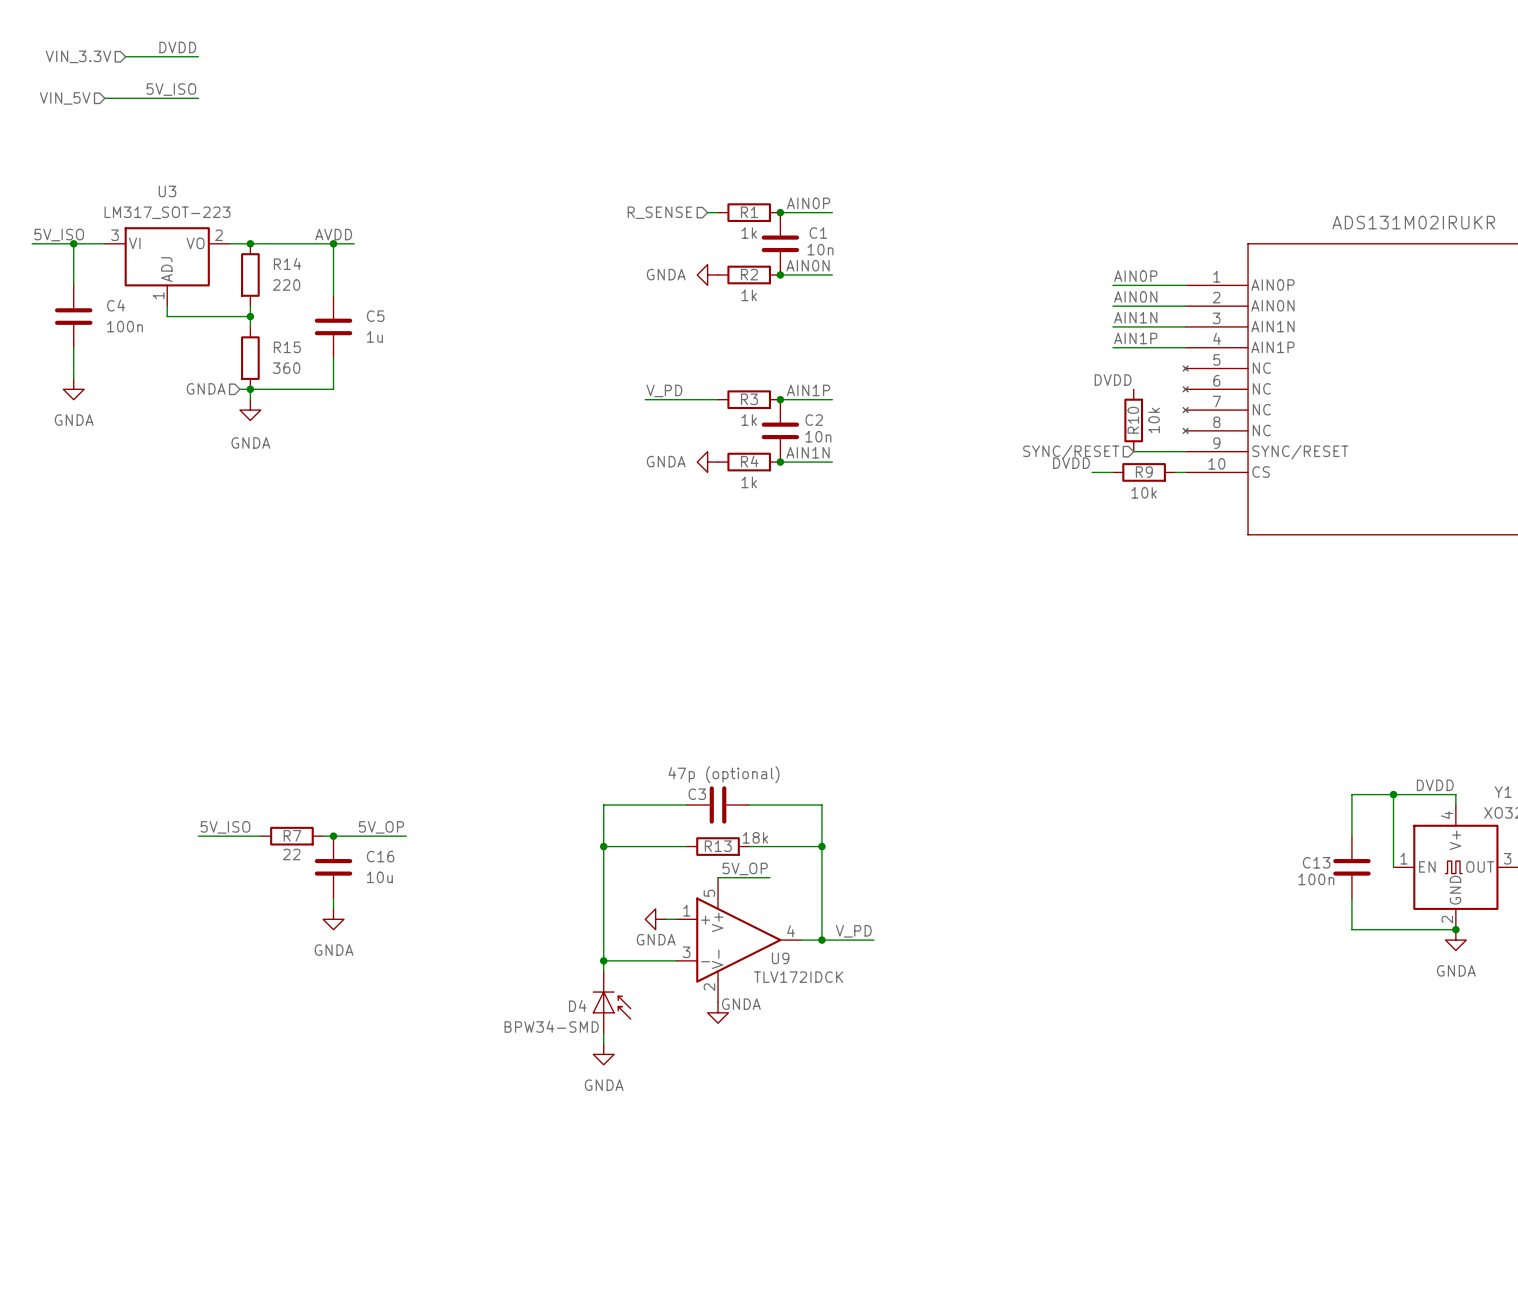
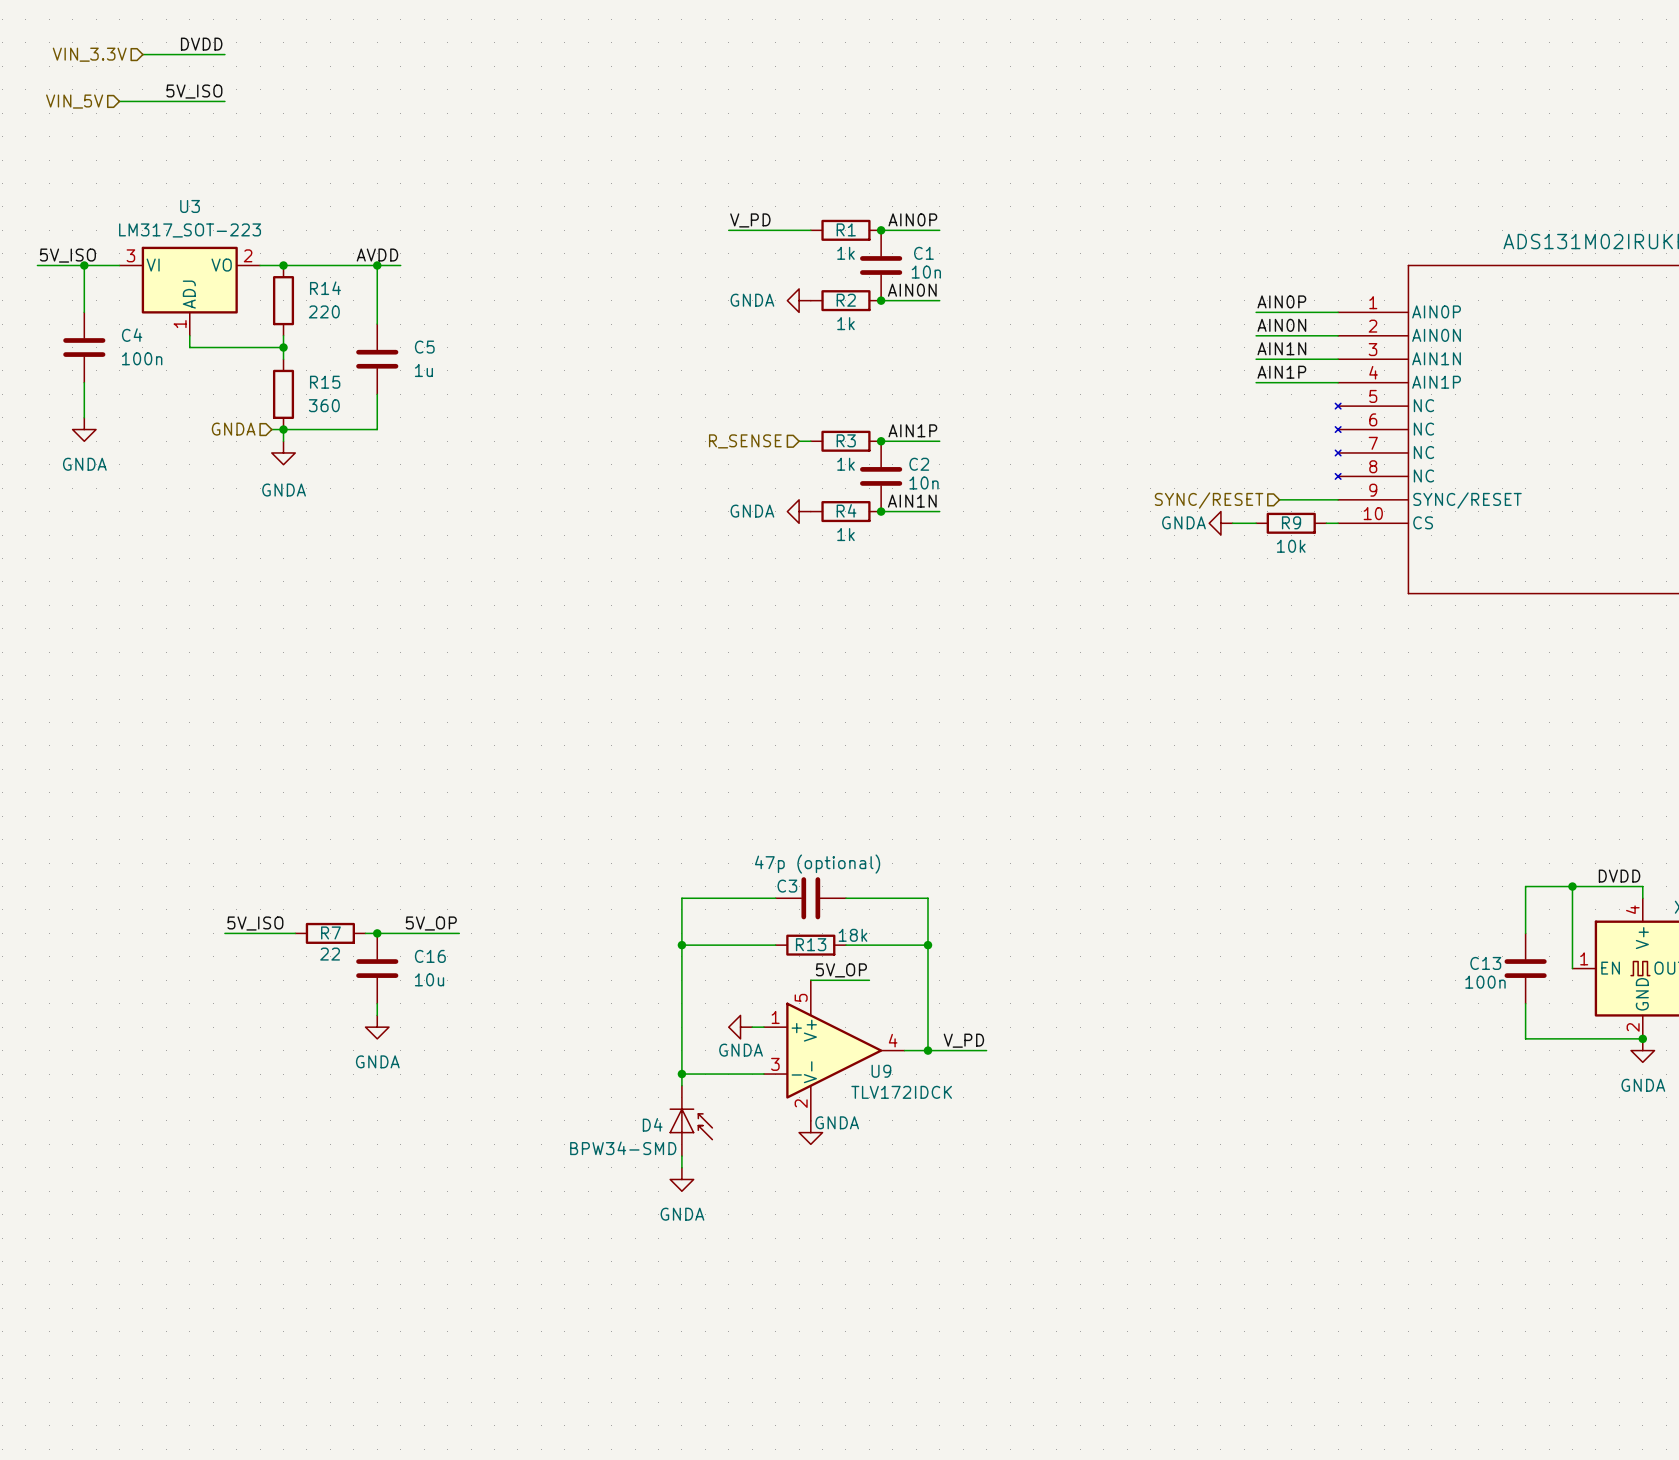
hierarchical label position: R_SENSE (659, 212) -> R_SENSE (745, 441)
label: DVDD (1113, 380) -> none
label position: V_PD (664, 390) -> V_PD (750, 220)
wire: (645, 399) (707, 399) -> (728, 230) (799, 230)
R10: 10k (1133, 420) -> none
label: DVDD (1071, 463) -> none
power symbol: none -> GNDA (1220, 523)

